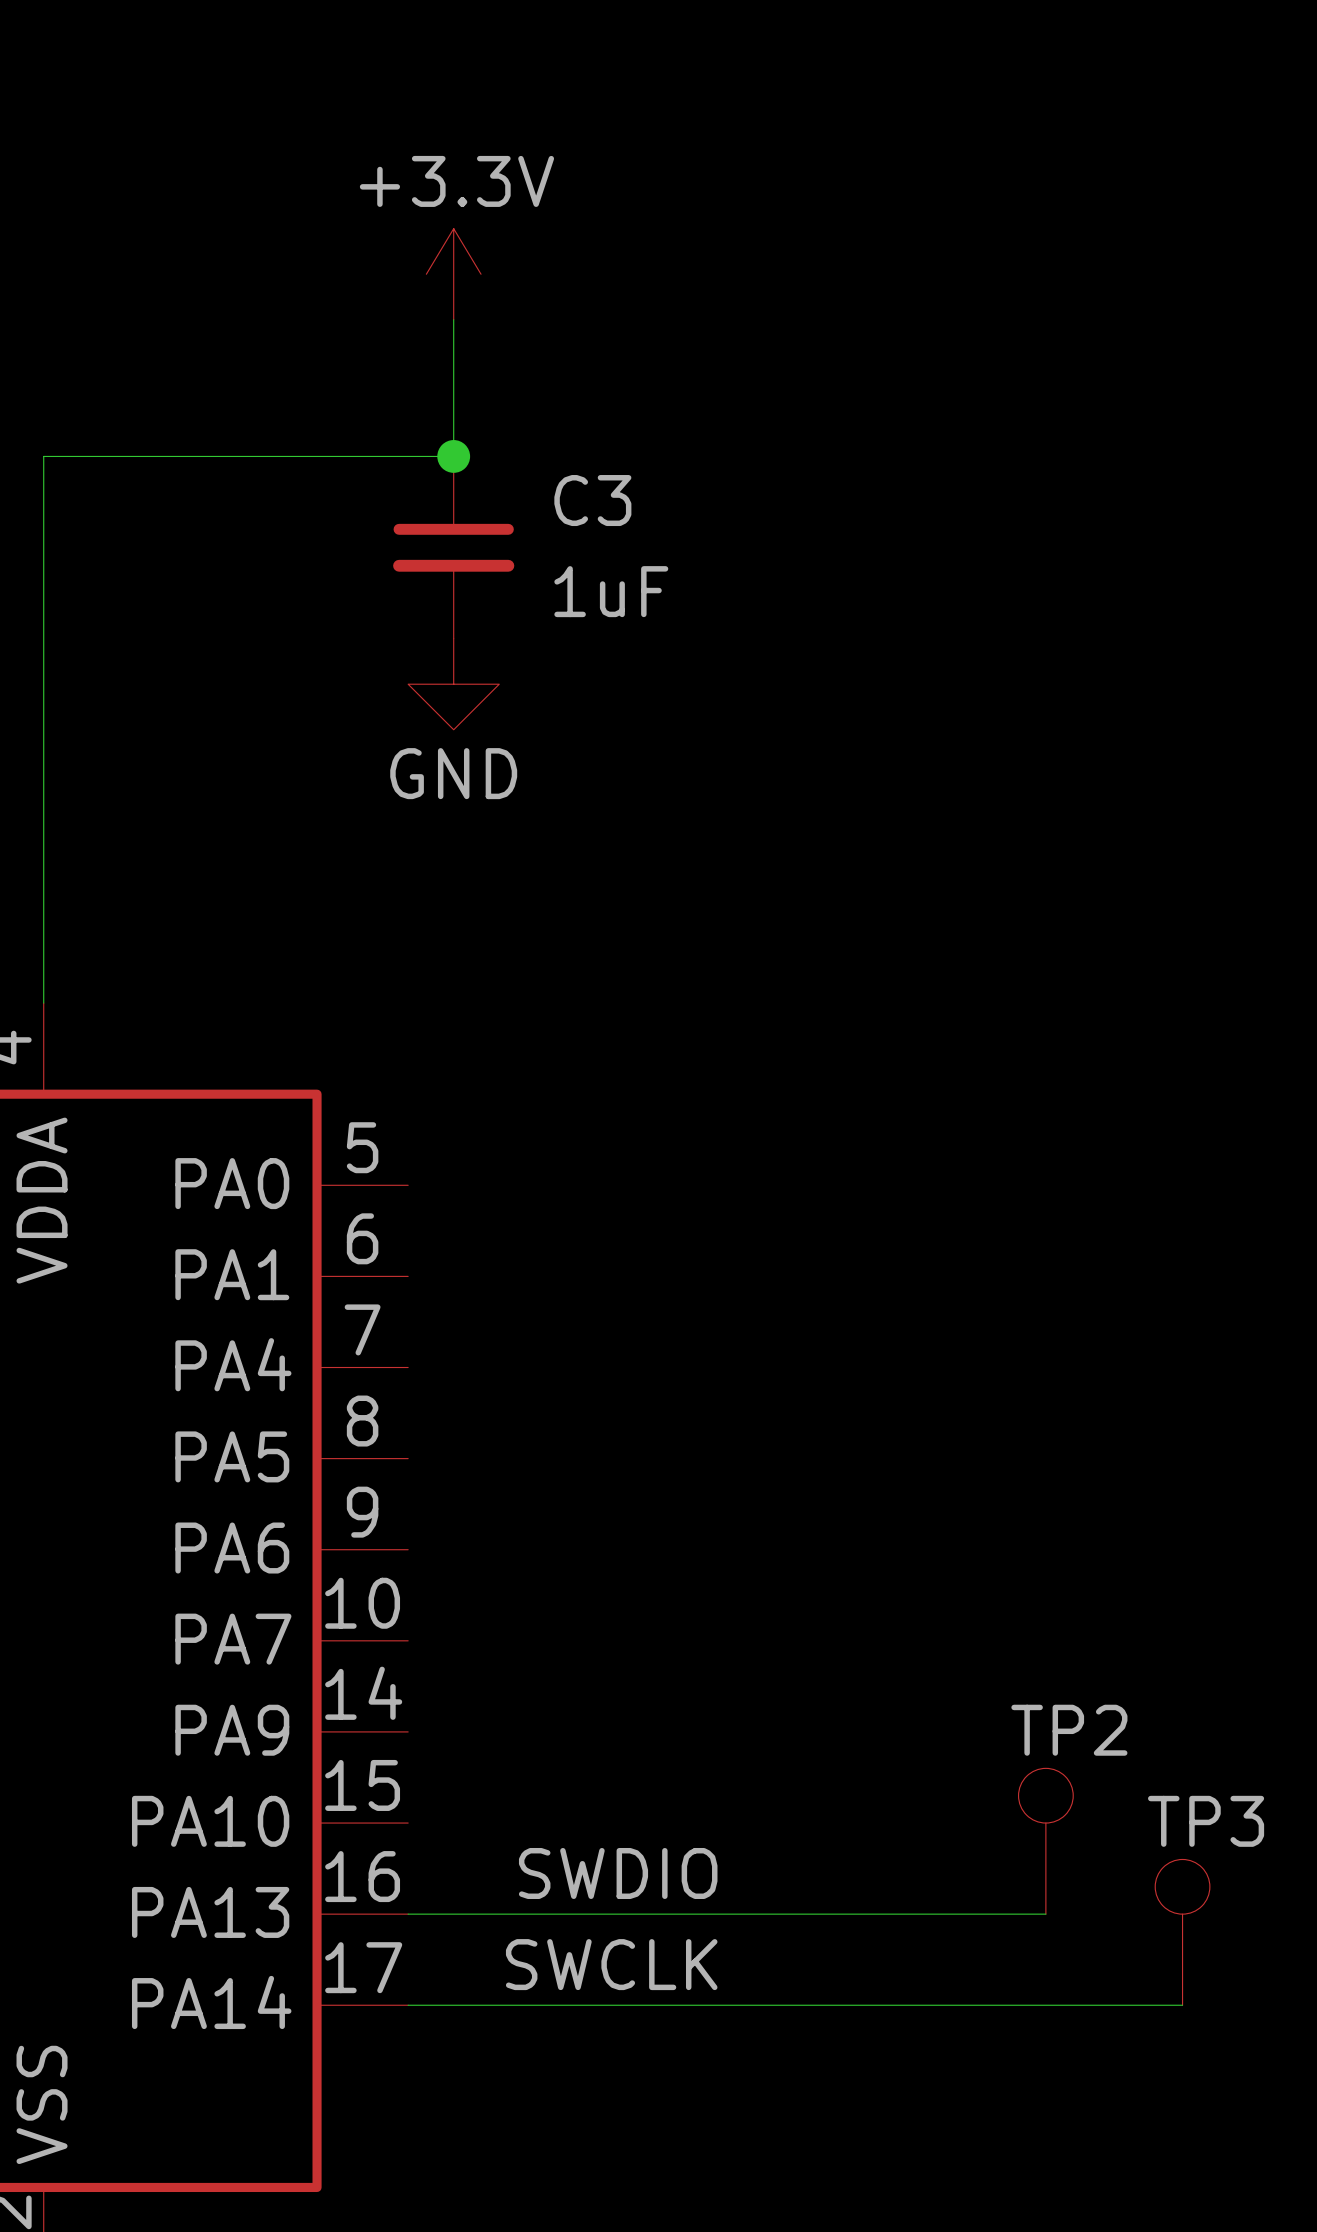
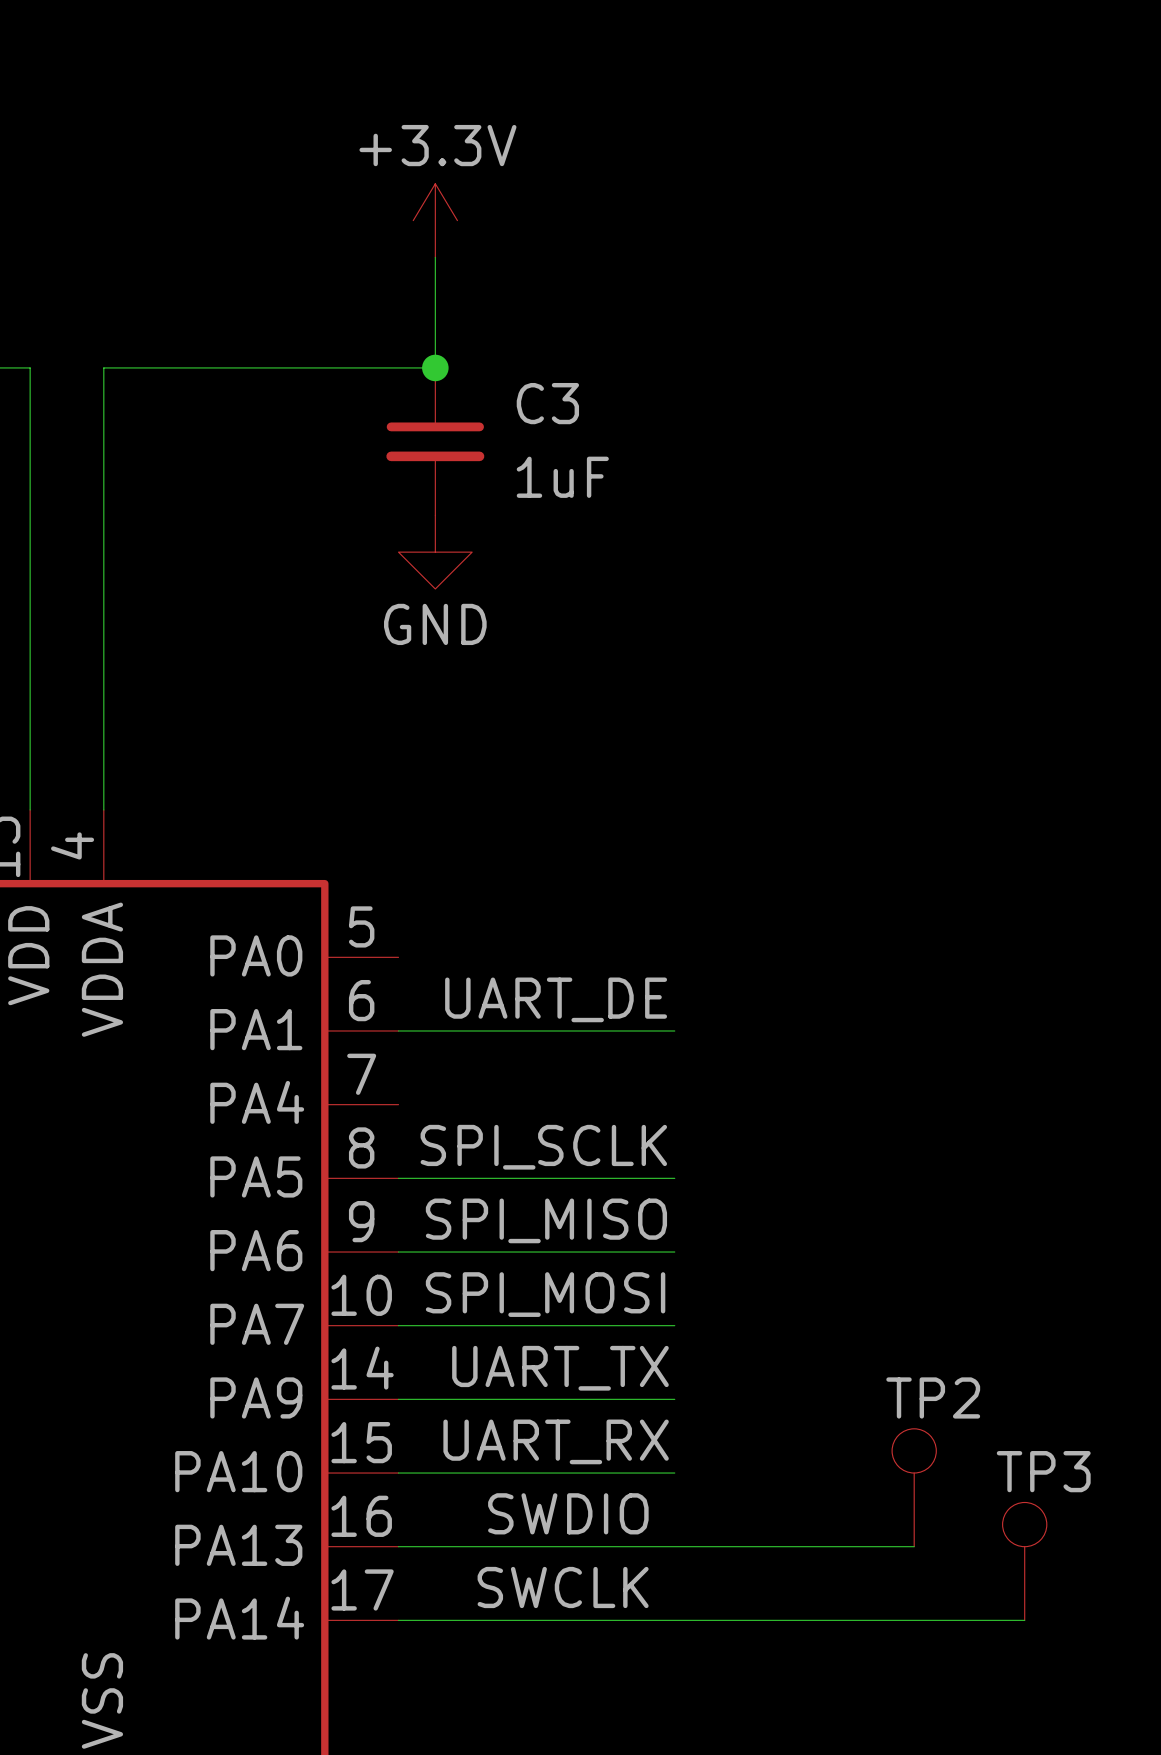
label: none -> UART_DE (556, 999)
wire: none -> (398, 1030) (674, 1030)
label: none -> SPI_SCLK (543, 1147)
wire: none -> (398, 1178) (674, 1178)
label: none -> SPI_MISO (546, 1220)
wire: none -> (398, 1252) (674, 1252)
label: none -> SPI_MOSI (545, 1294)
wire: none -> (398, 1325) (674, 1325)
label: none -> UART_TX (560, 1368)
wire: none -> (398, 1399) (674, 1399)
label: none -> UART_RX (556, 1441)
wire: none -> (398, 1473) (674, 1473)

